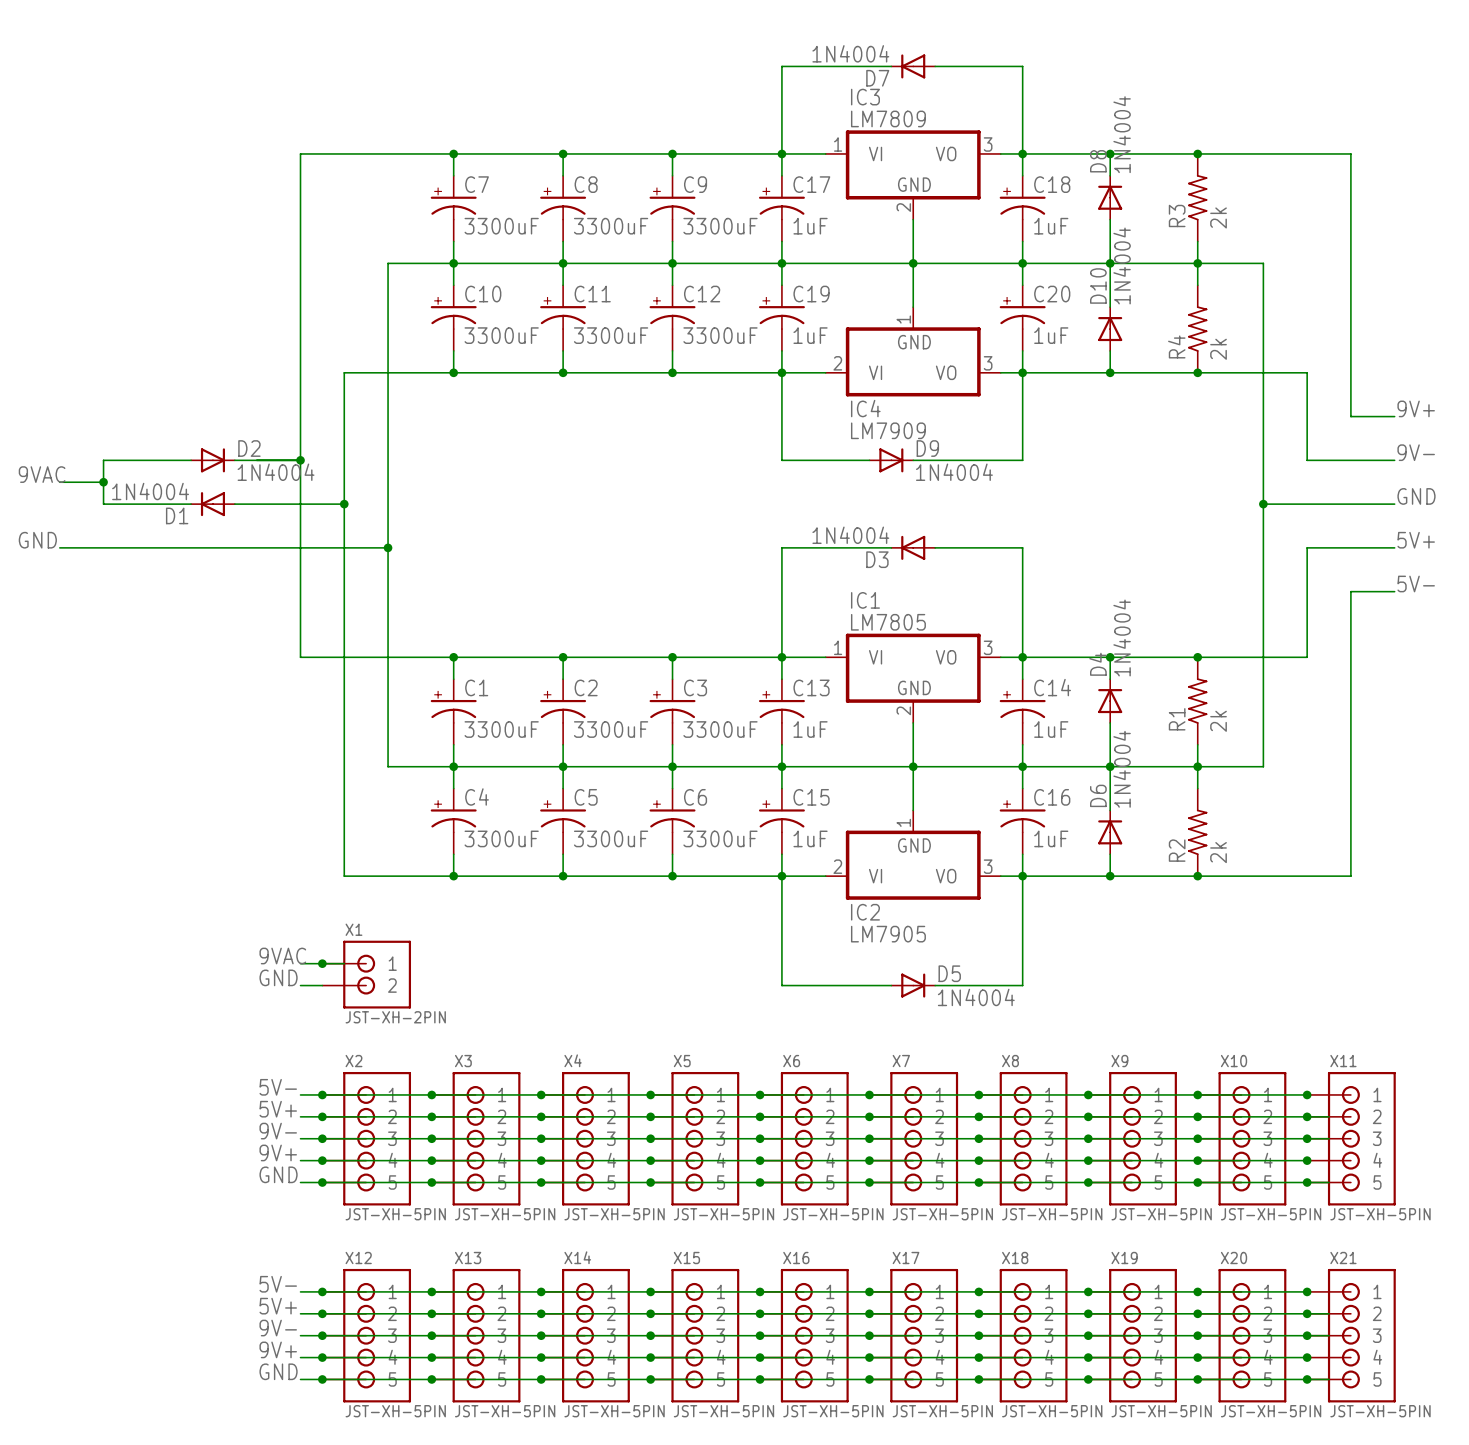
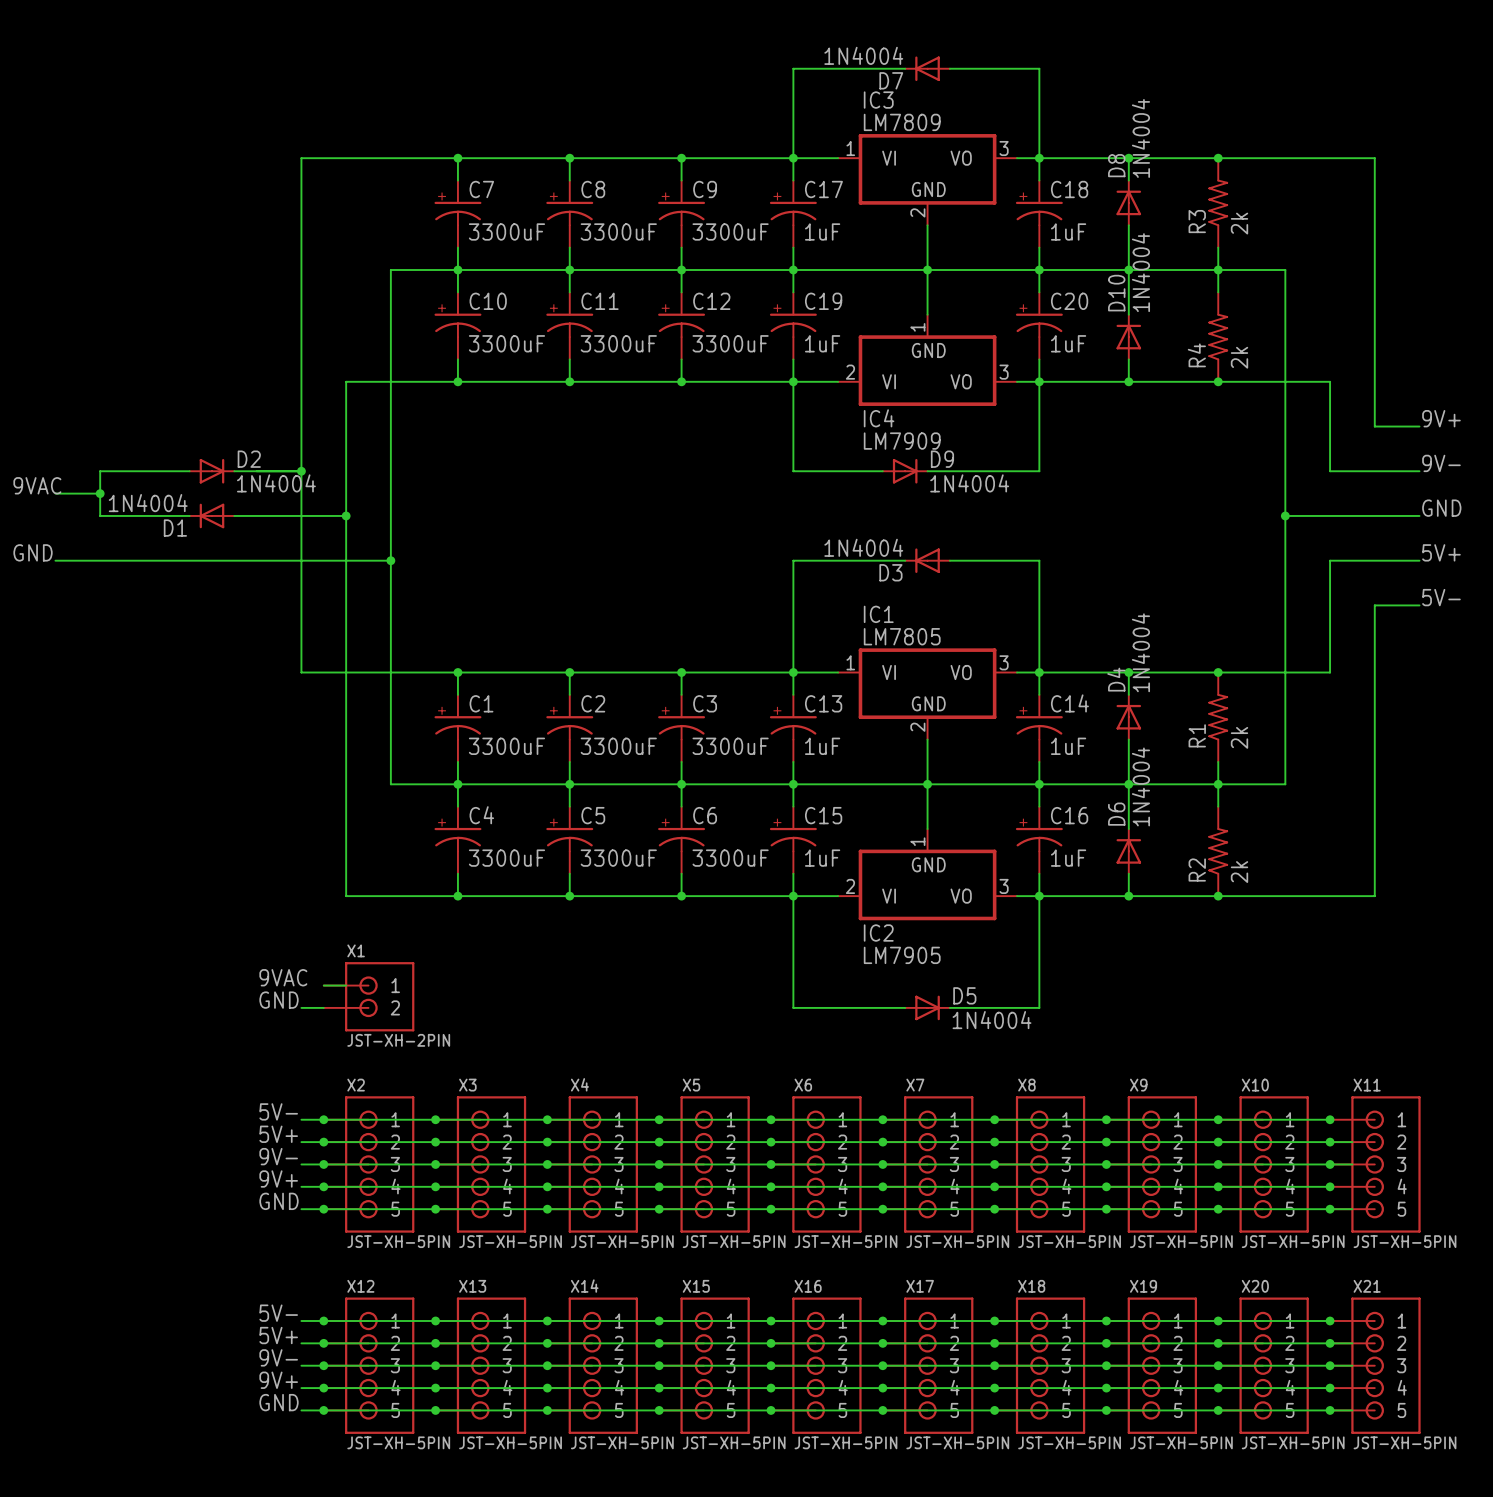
wire: (300, 963) (322, 963) -> none
junction: (322, 963) -> none

